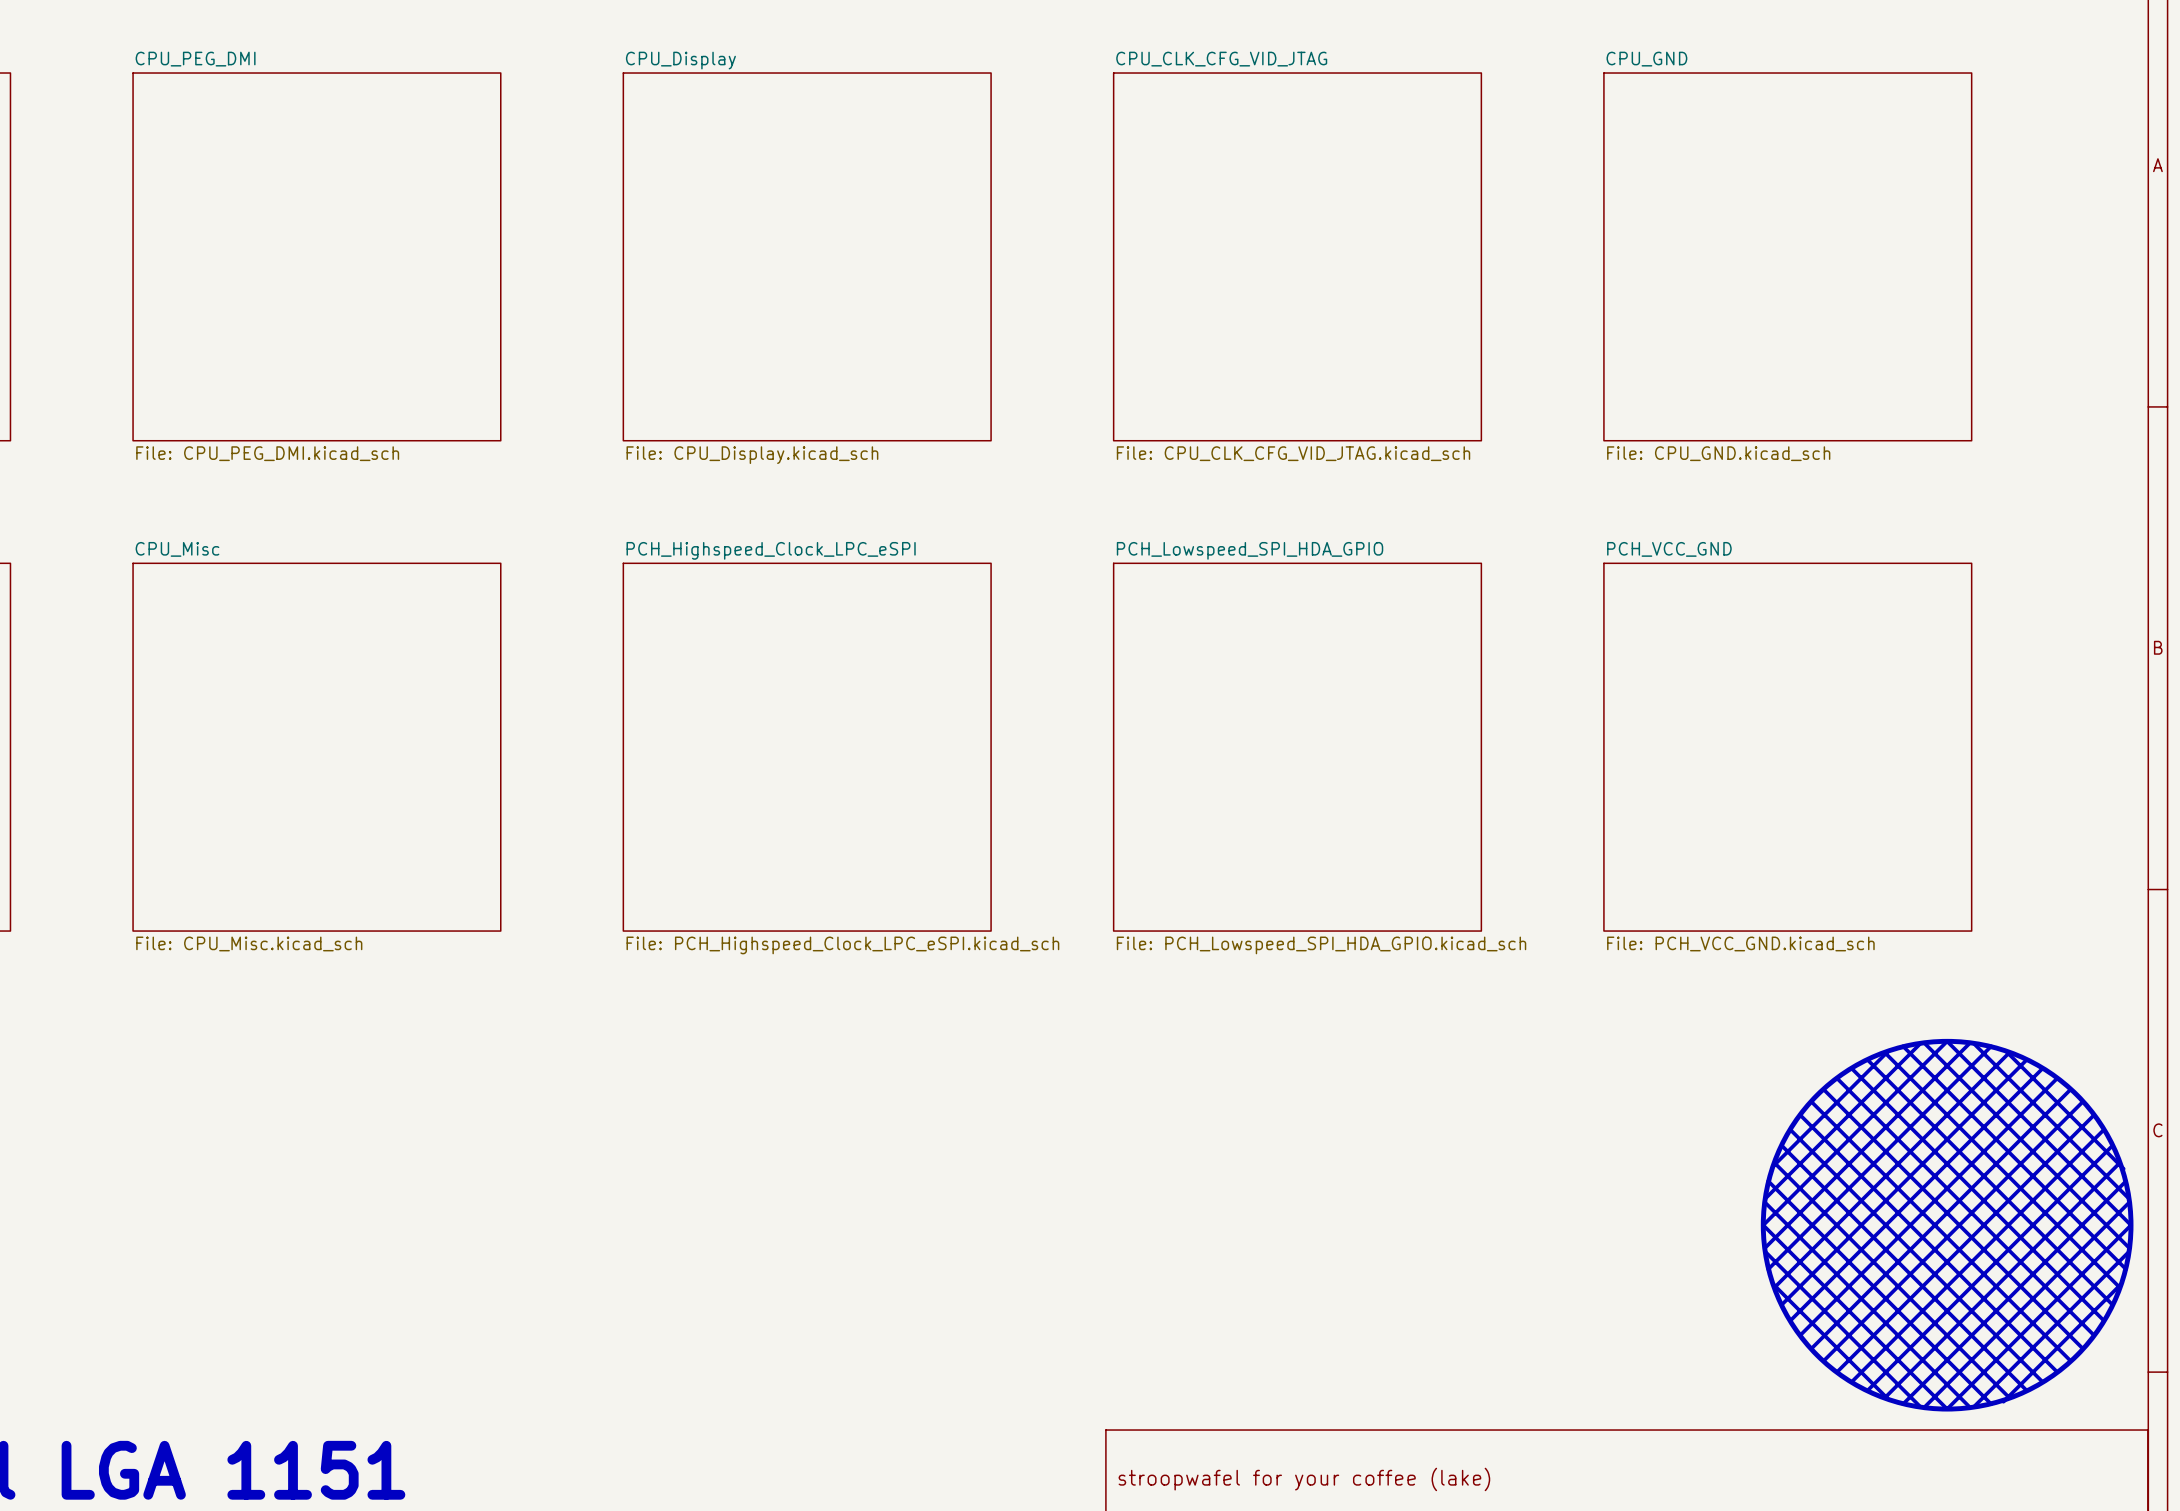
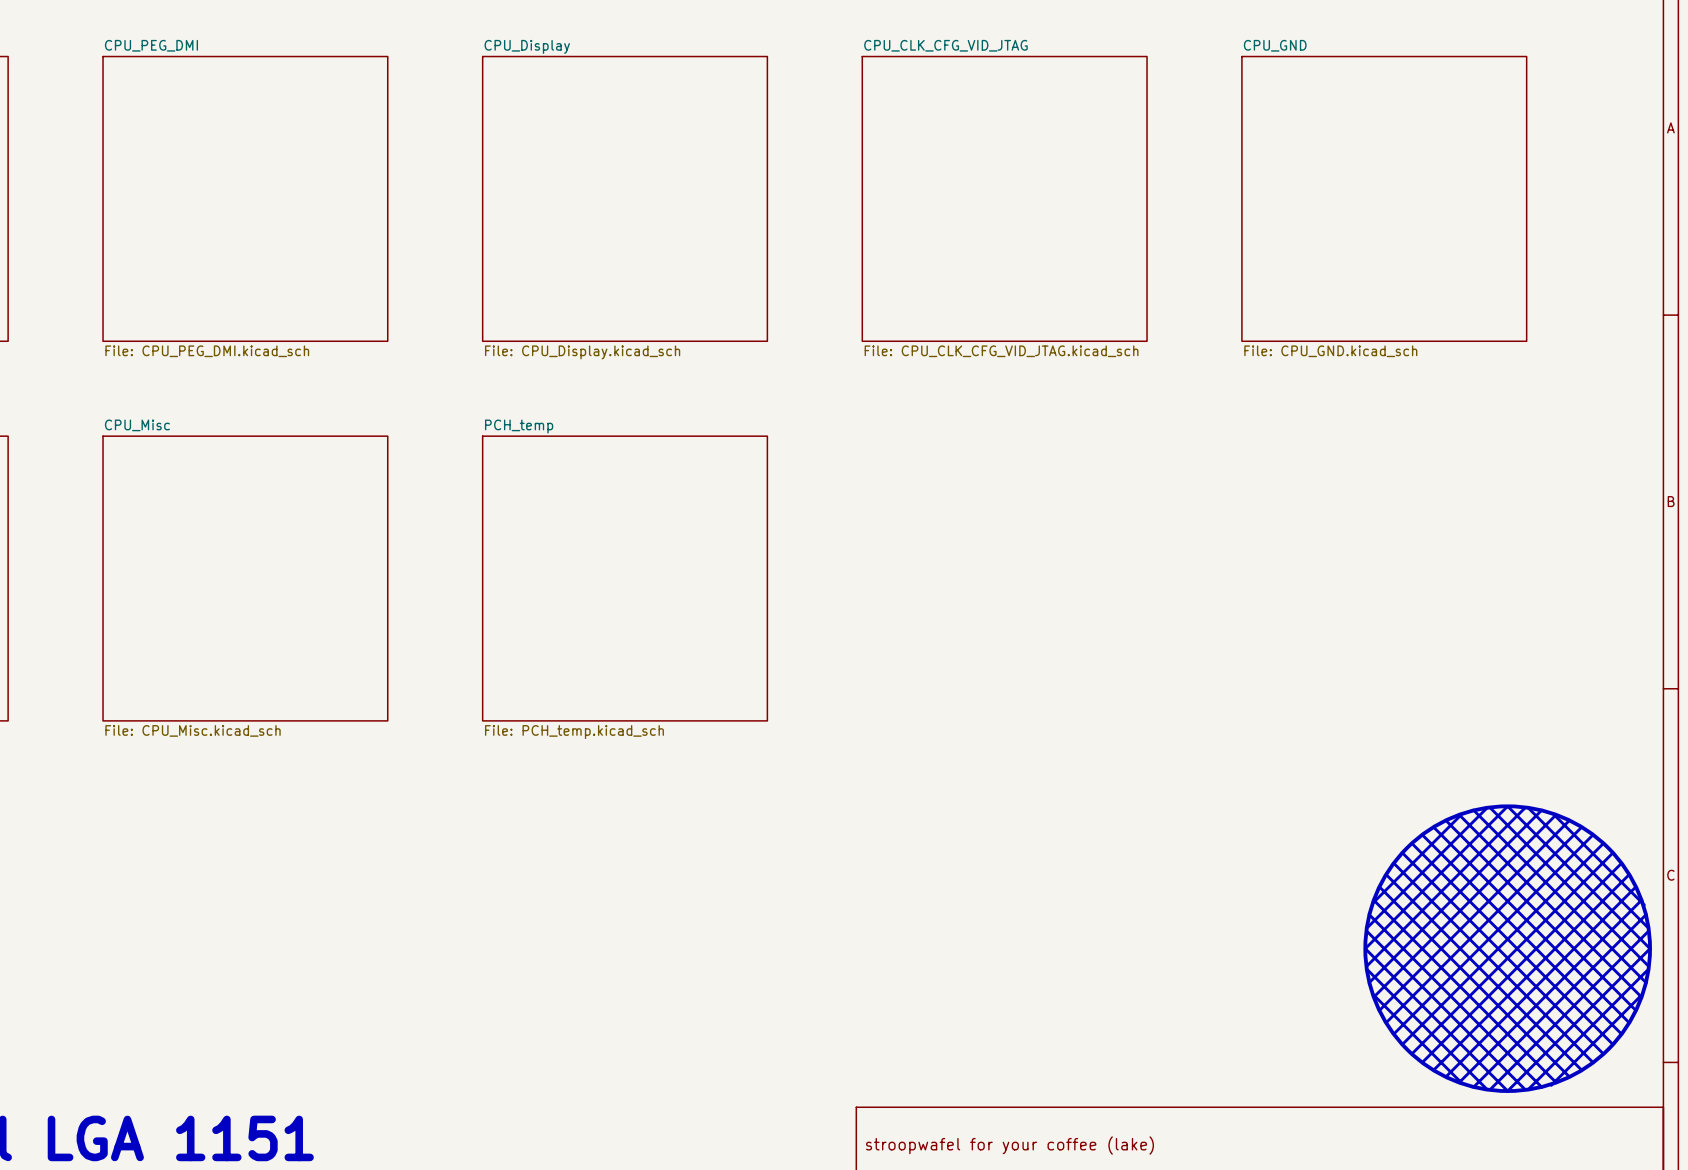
sheet PCH_Highspeed_Clock_LPC_eSPI name: PCH_Highspeed_Clock_LPC_eSPI (771, 550) -> PCH_temp (519, 426)
sheet PCH_Lowspeed_SPI_HDA_GPIO: File: PCH_Lowspeed_SPI_HDA_GPIO.kicad_sch (1297, 747) -> none
sheet PCH_VCC_GND: File: PCH_VCC_GND.kicad_sch (1787, 747) -> none
sheet PCH_Highspeed_Clock_LPC_eSPI value: File: PCH_Highspeed_Clock_LPC_eSPI.kicad_sch (842, 945) -> File: PCH_temp.kicad_sch (574, 732)

